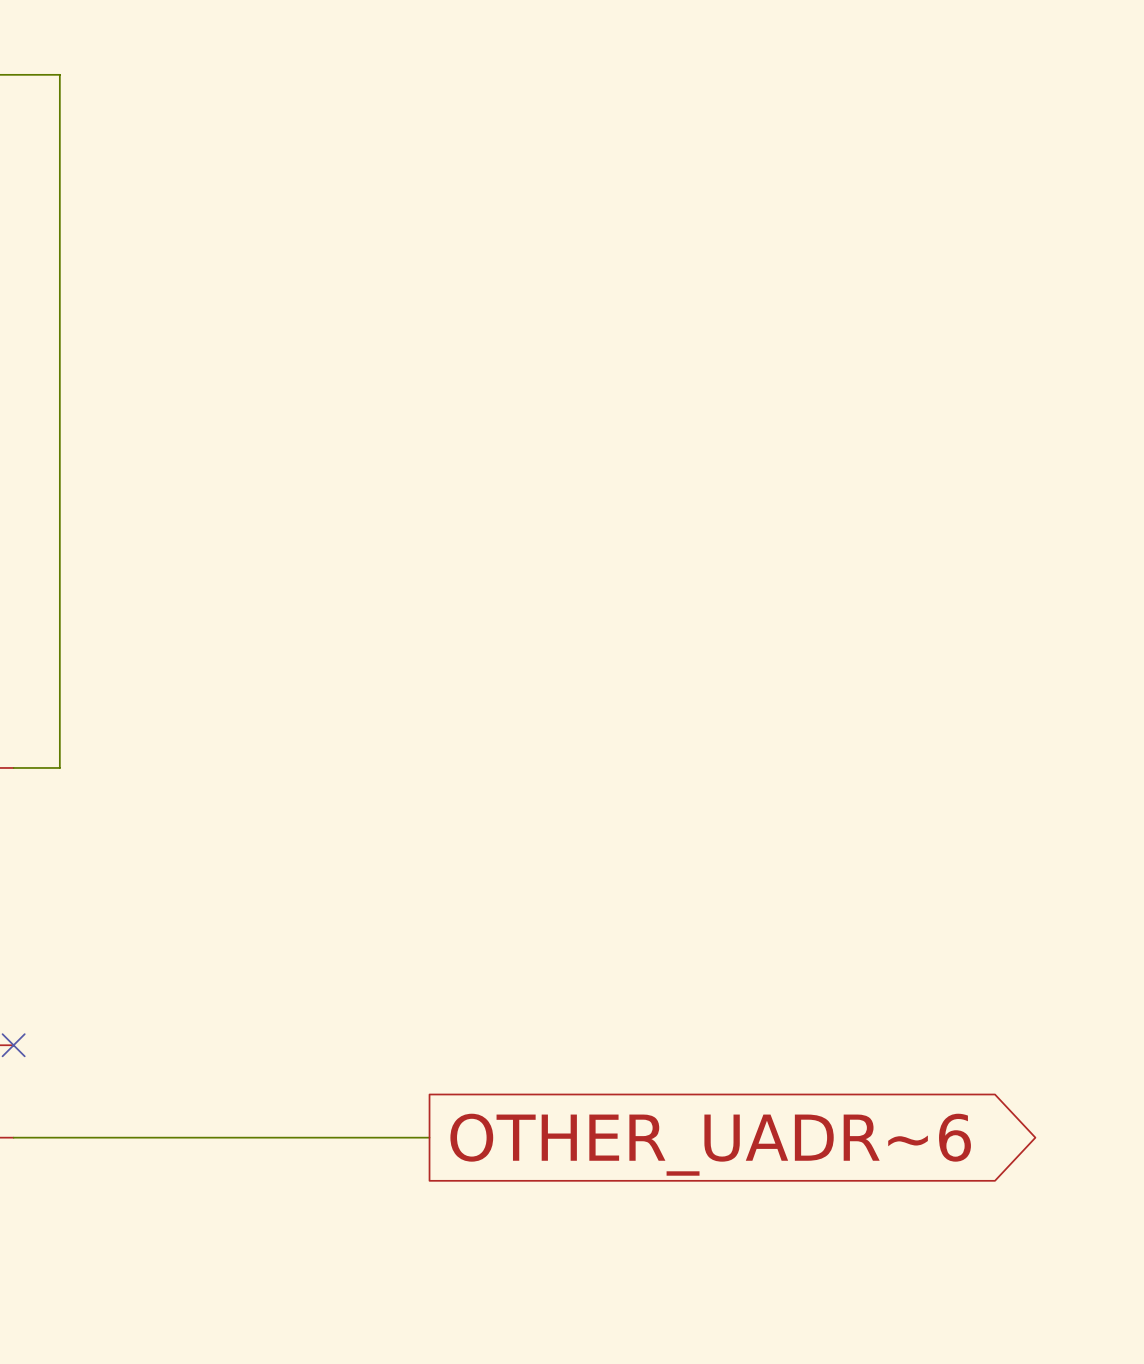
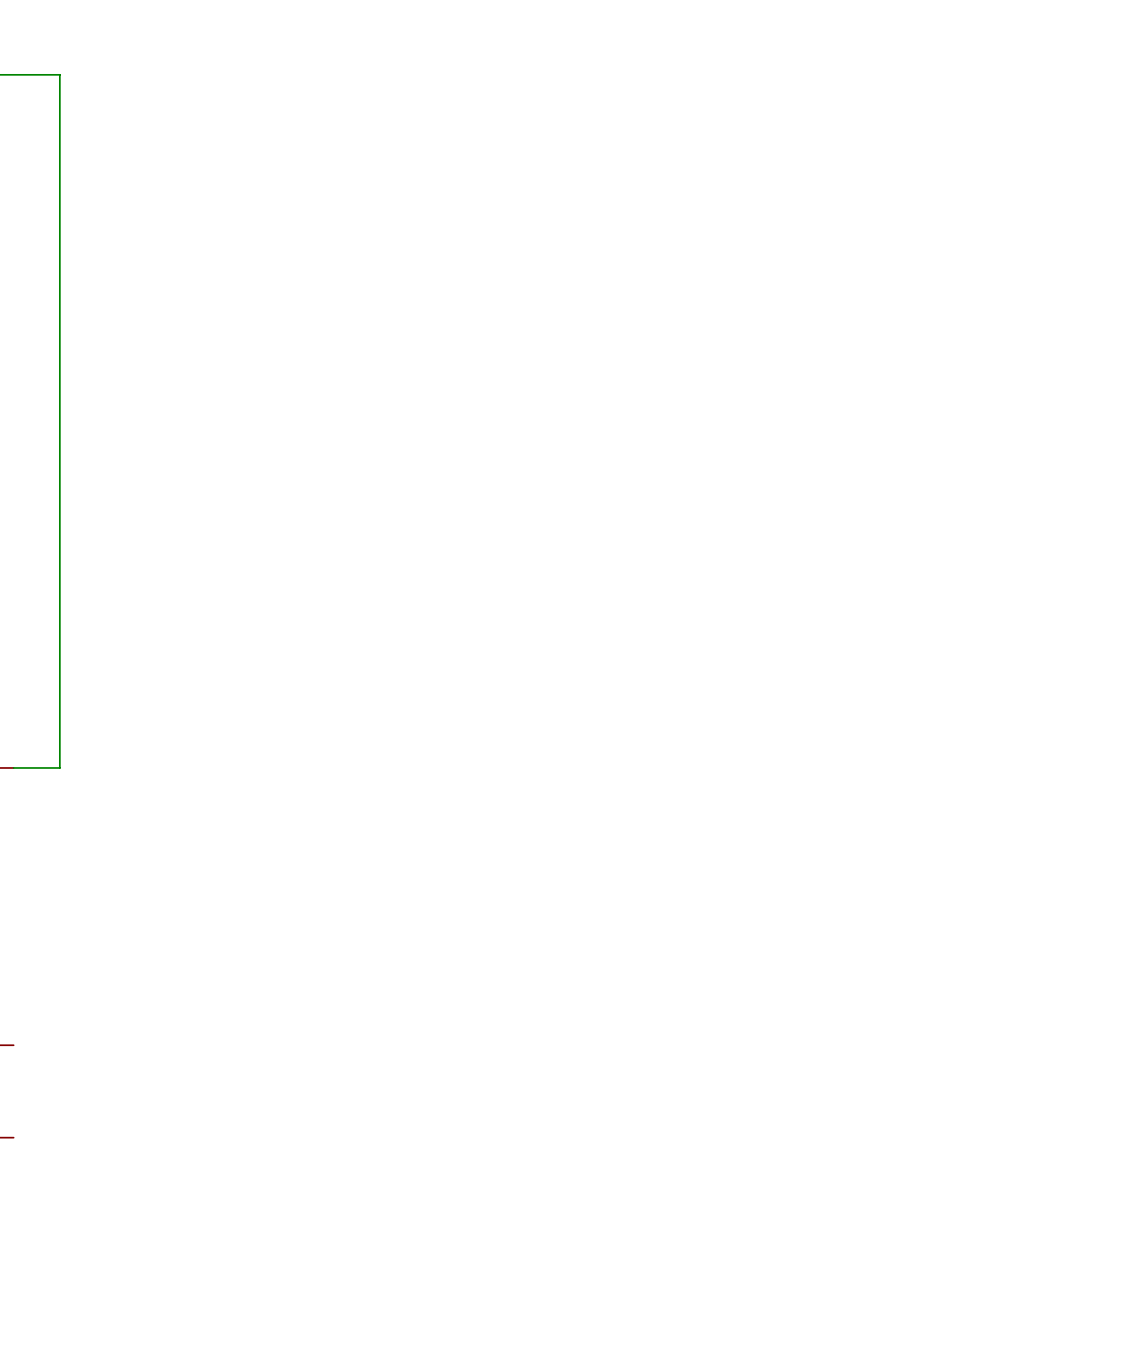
no-connect mark: (13, 1045) -> none
wire: (13, 1137) (429, 1137) -> none
global label: OTHER_UADR~6 (710, 1144) -> none

